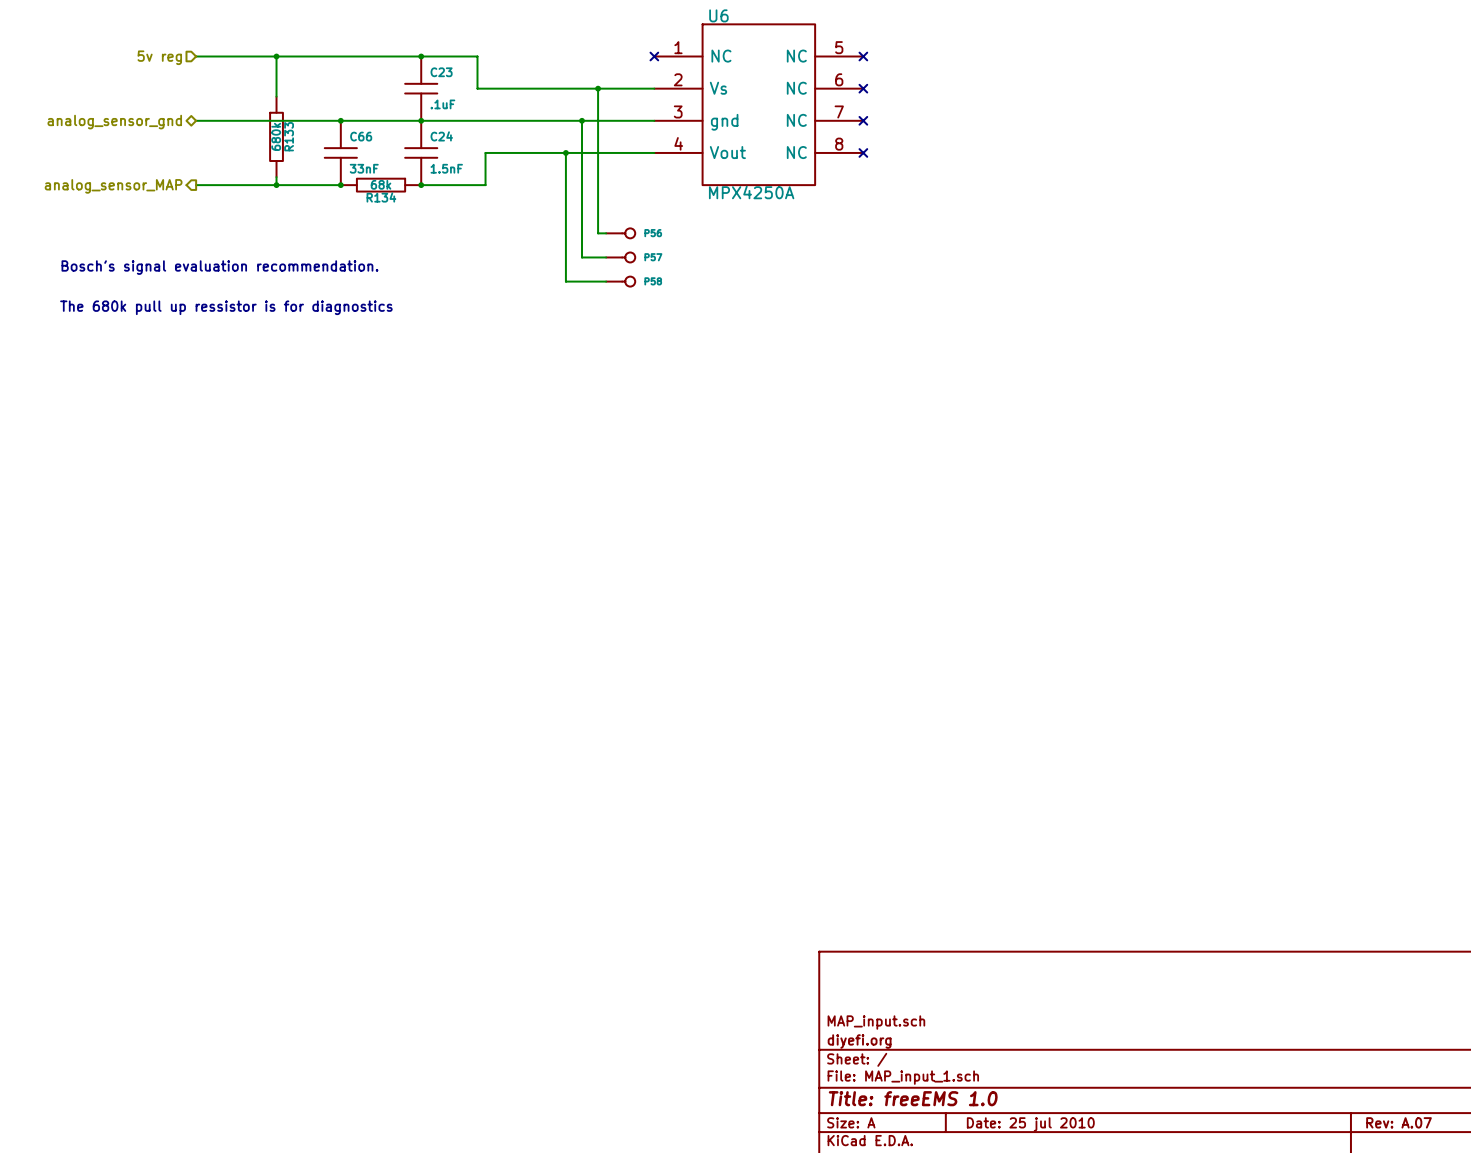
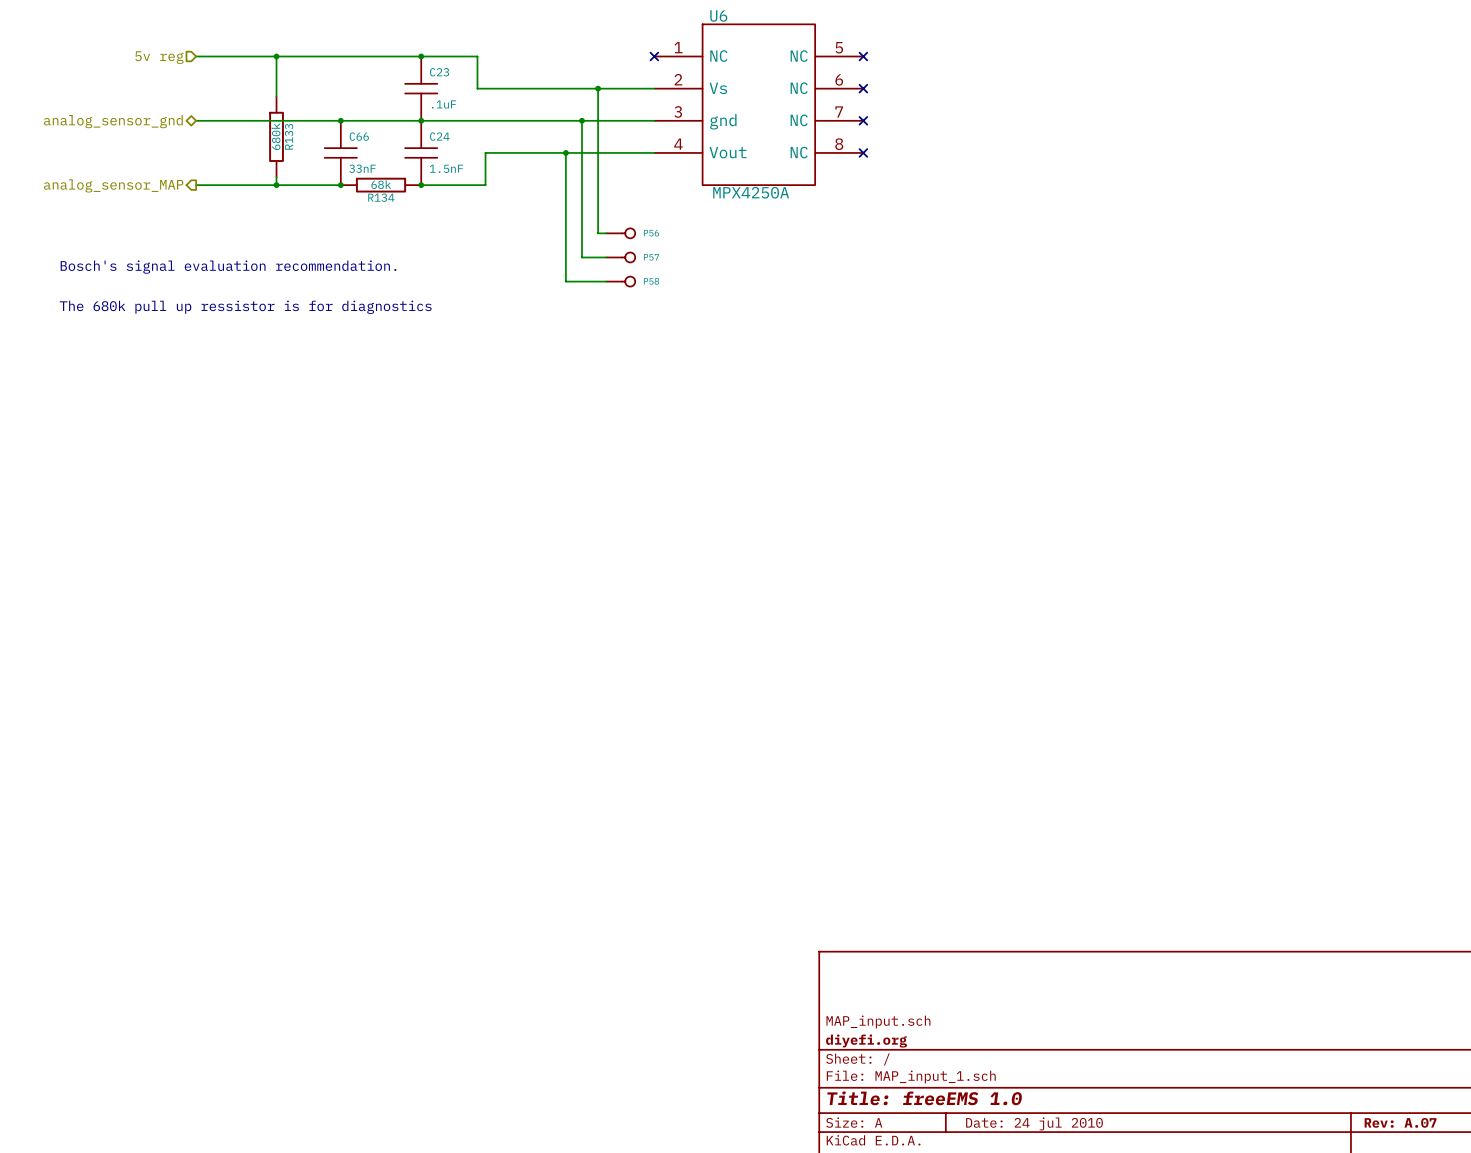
title block: Date: 25 jul 2010 (1030, 1124) -> Date: 24 jul 2010 (1034, 1123)

